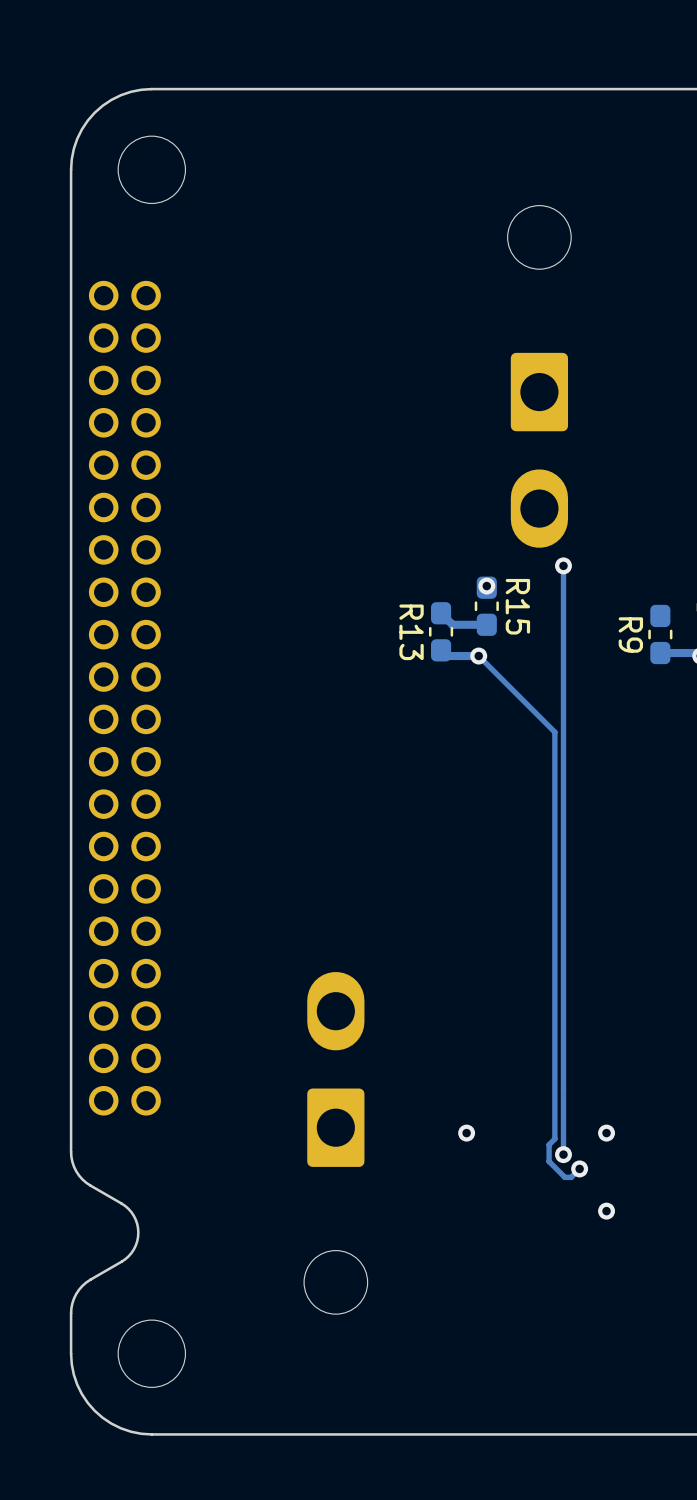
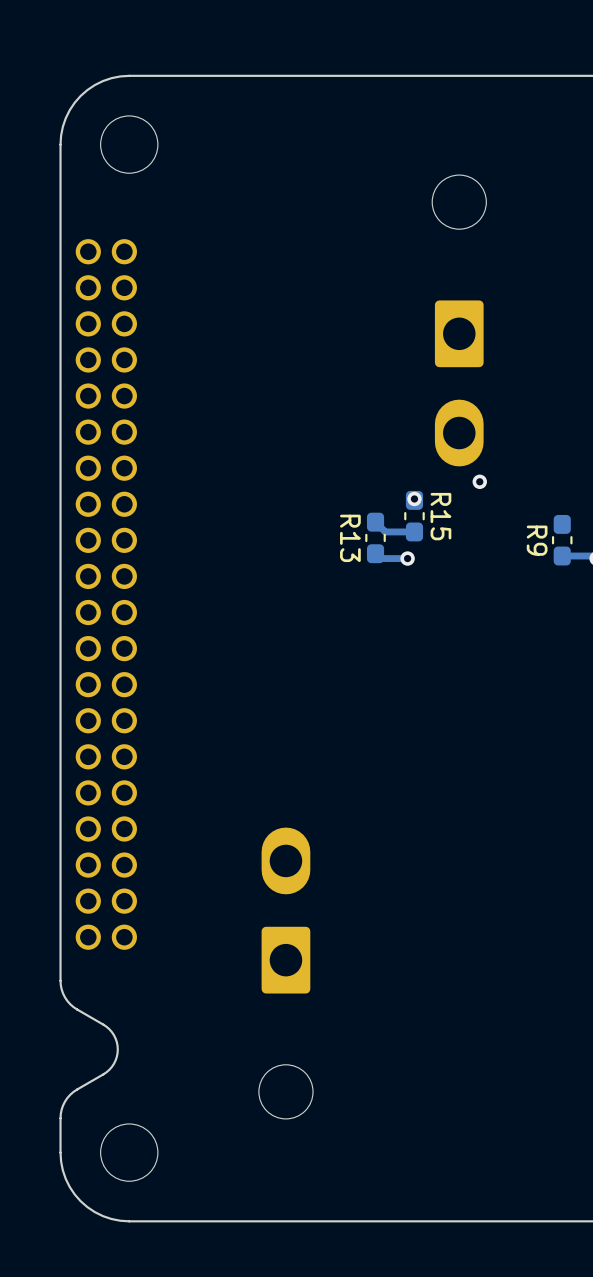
track: (563, 565) (563, 1154) -> none
track: (478, 656) (554, 732) (554, 1139) (549, 1144) (549, 1161) (564, 1177) (571, 1177) (579, 1168) -> none
via: (466, 1133) -> none
via: (606, 1133) -> none
via: (563, 1154) -> none
via: (579, 1168) -> none
via: (606, 1211) -> none

